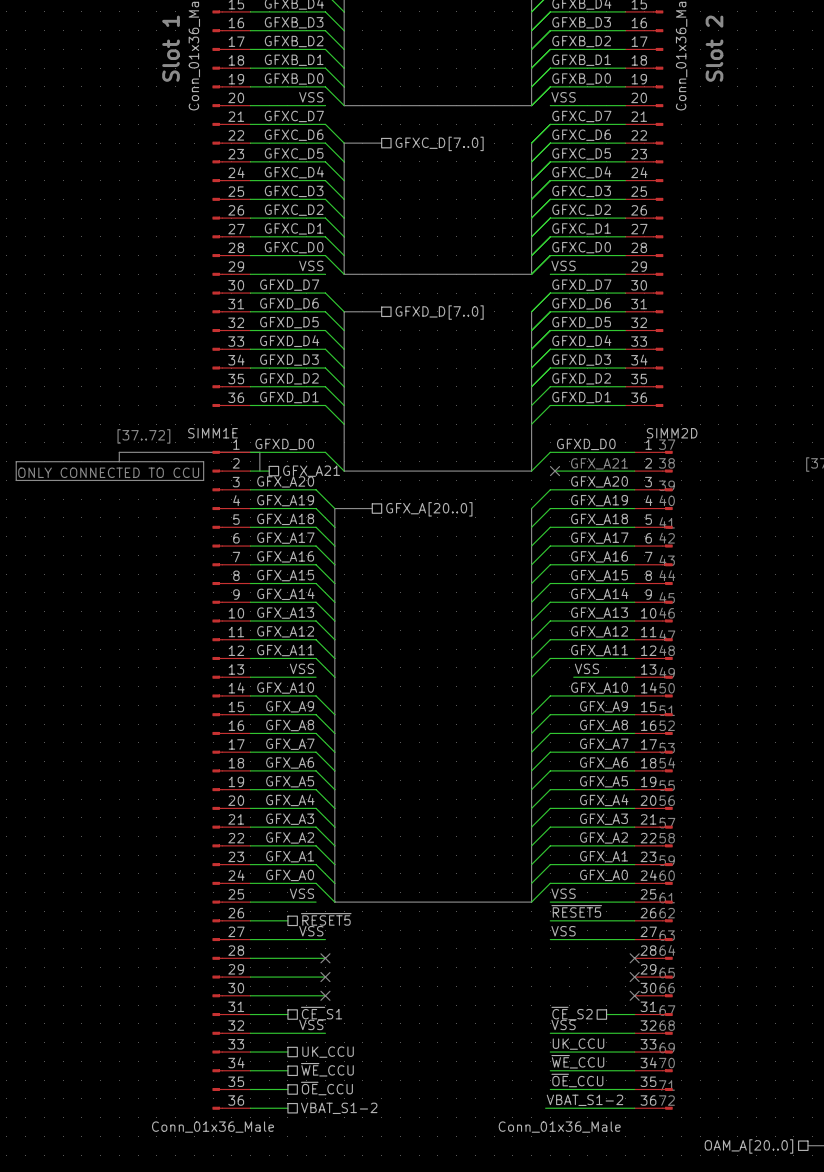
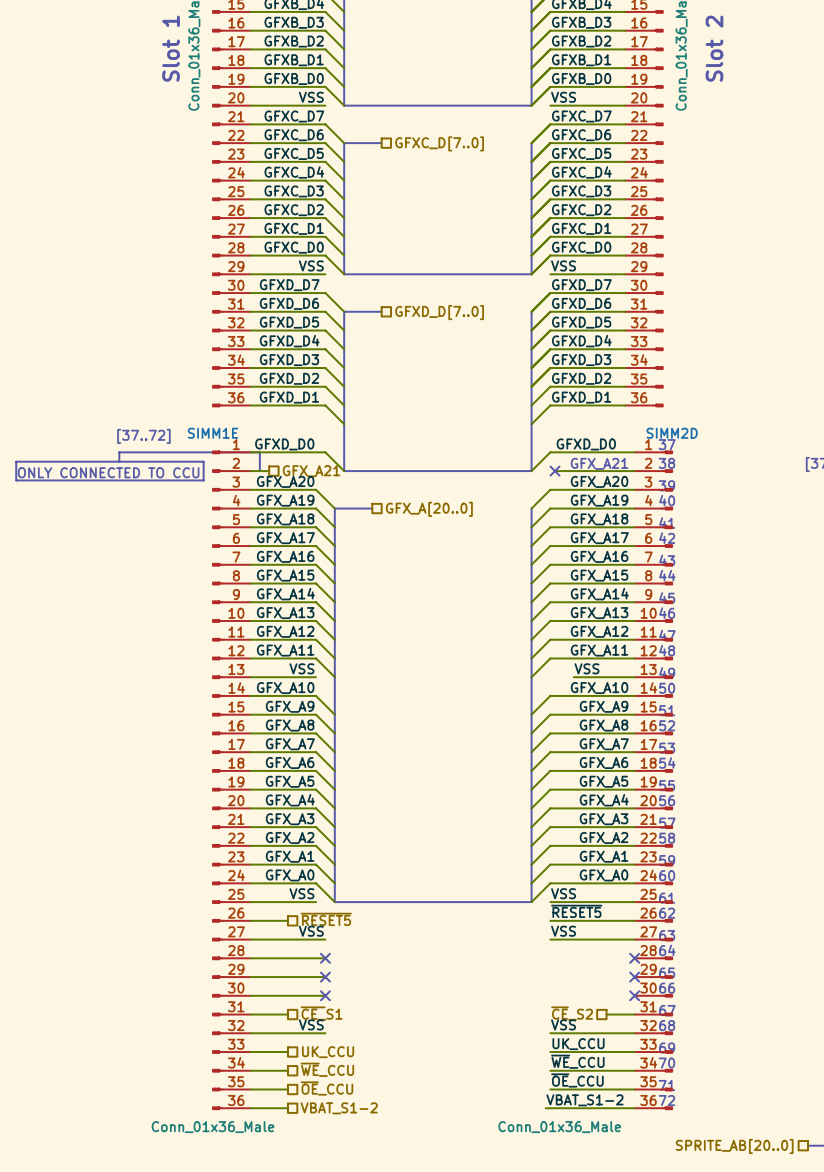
hierarchical label: OAM_A[20..0] (748, 1146) -> SPRITE_AB[20..0] (734, 1146)

